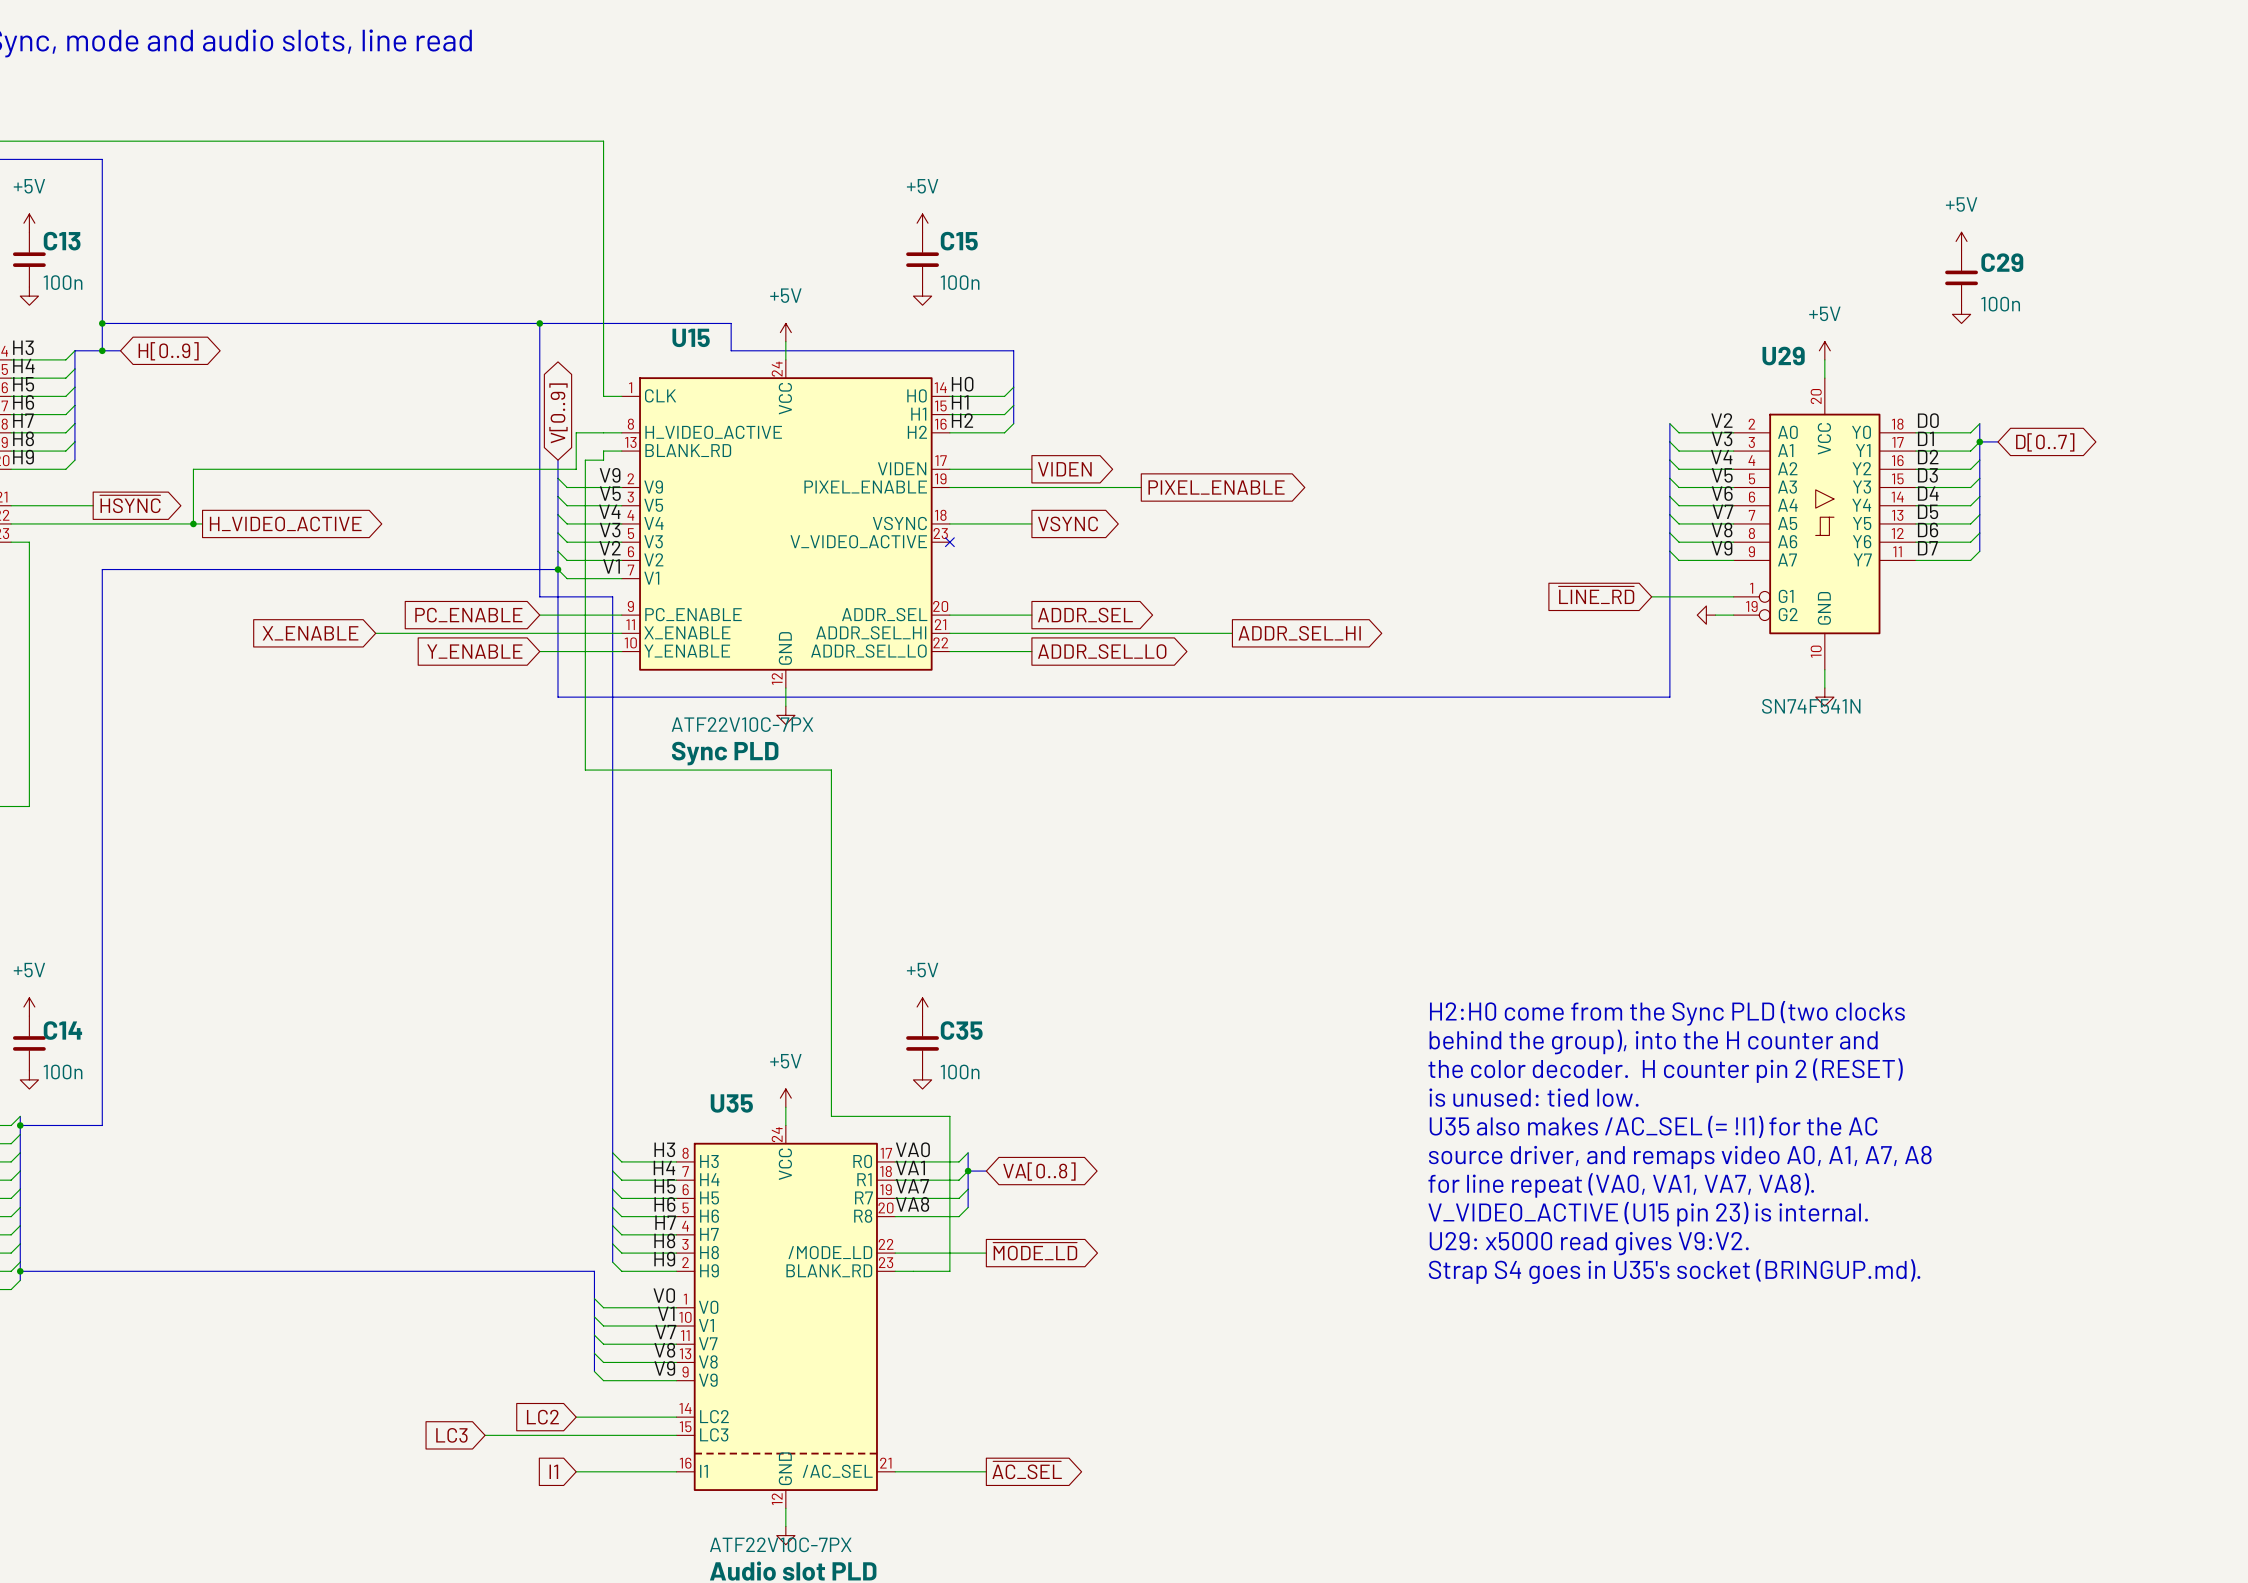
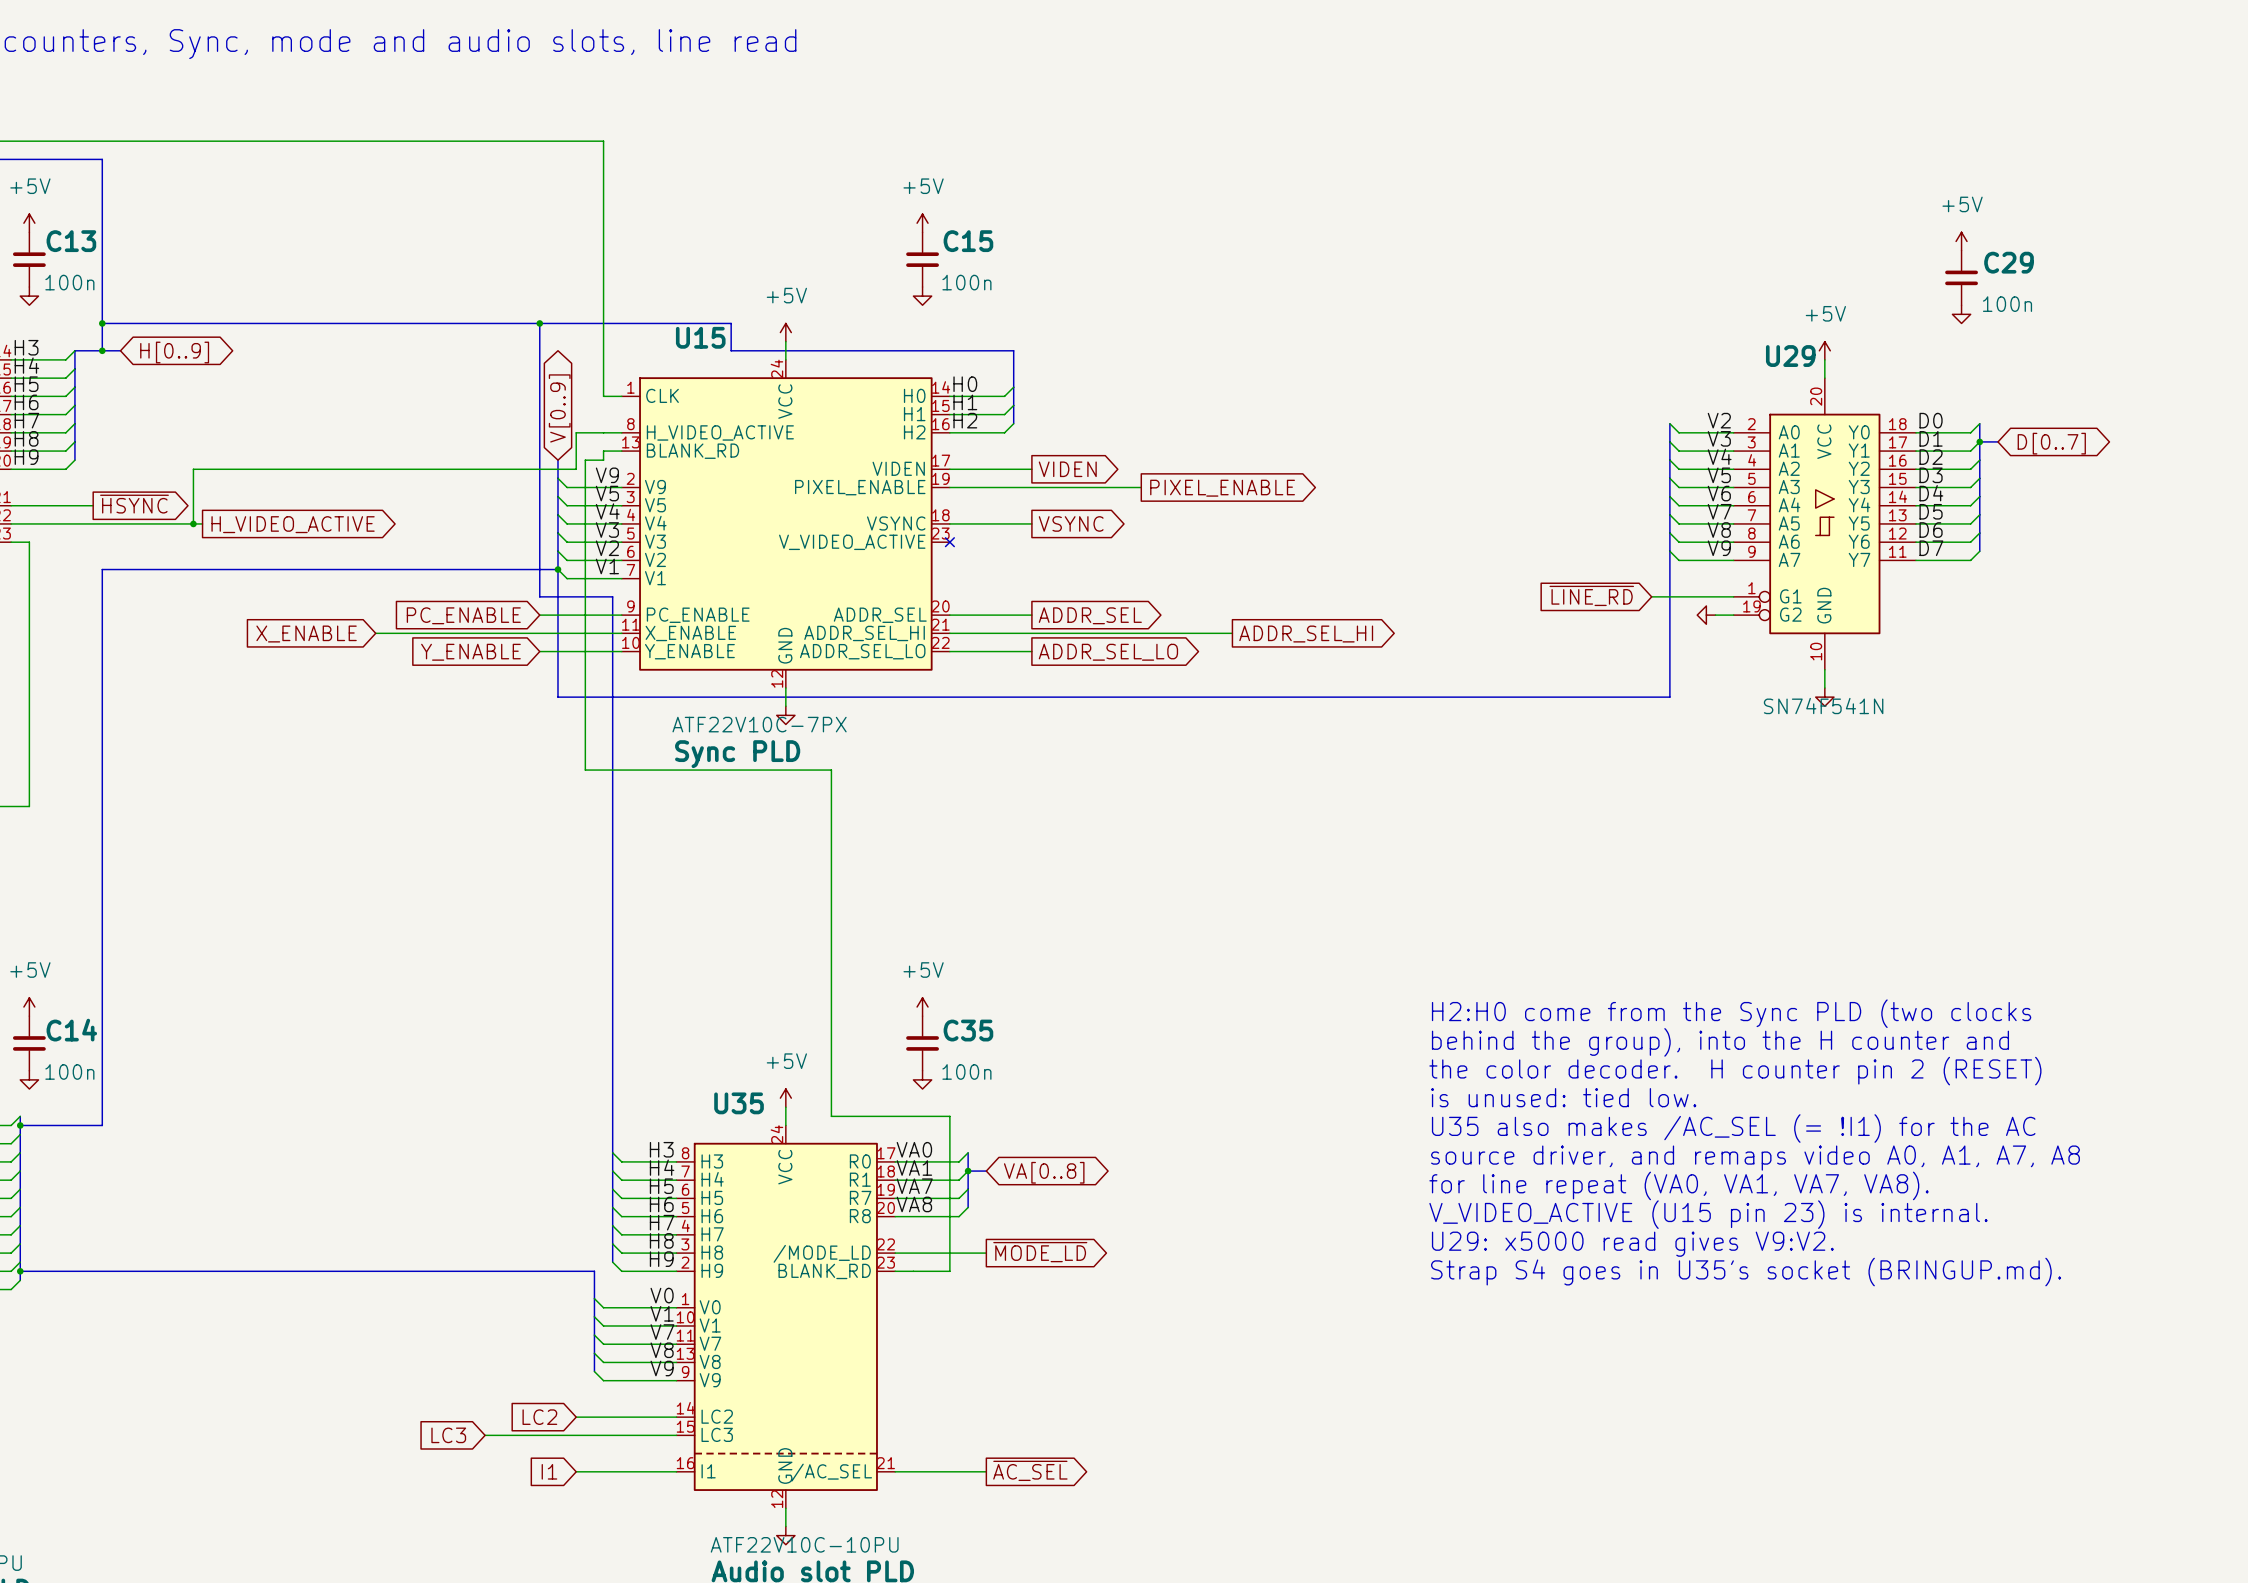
U35 value: ATF22V10C-7PX (780, 1544) -> ATF22V10C-10PU (804, 1544)

